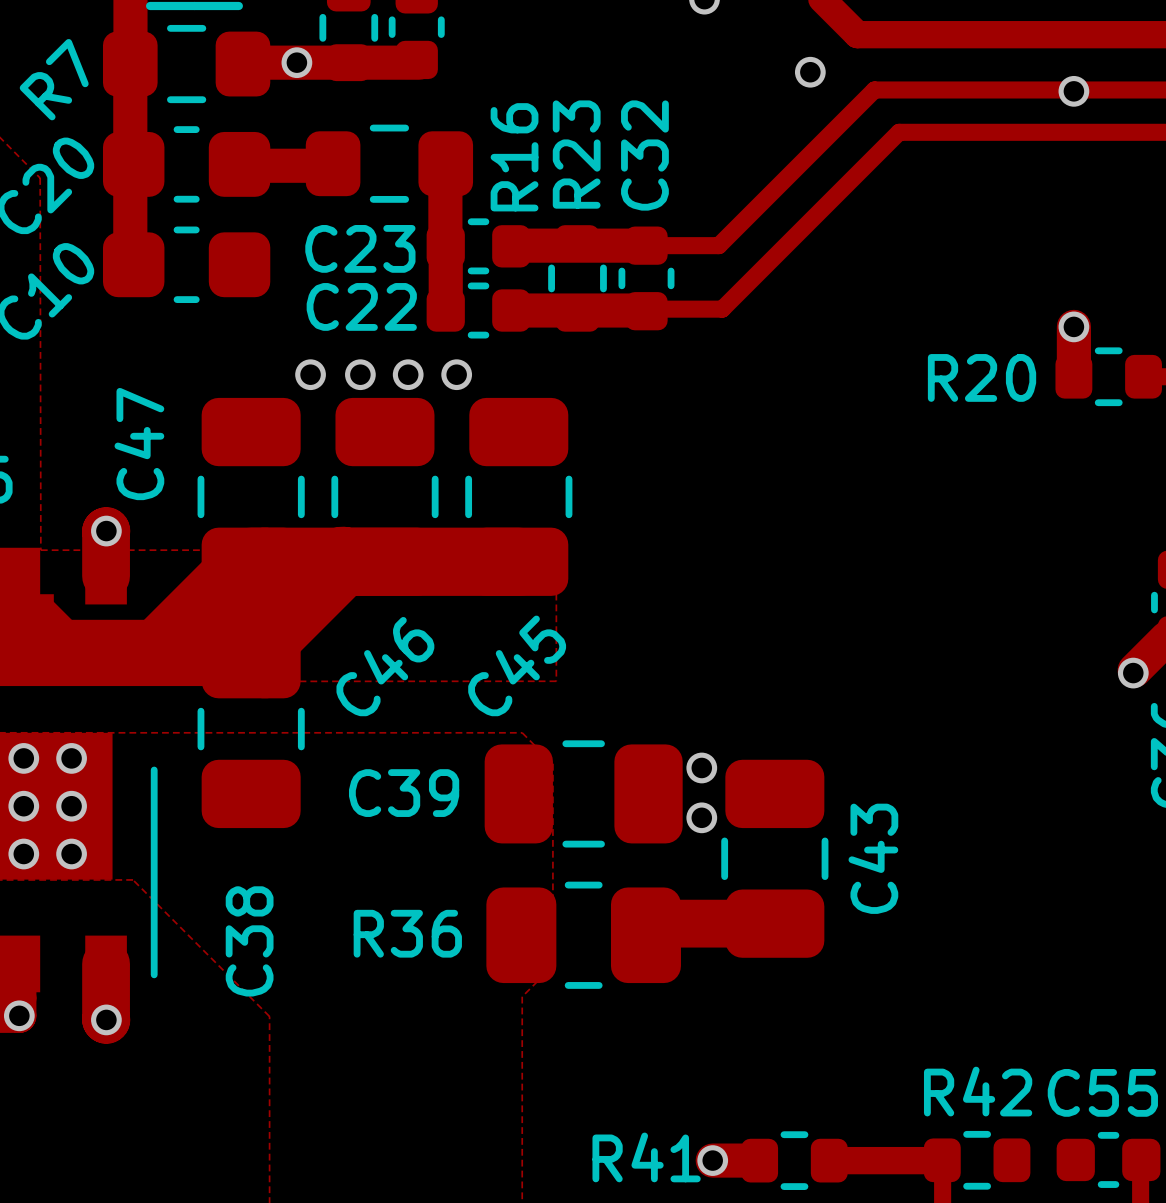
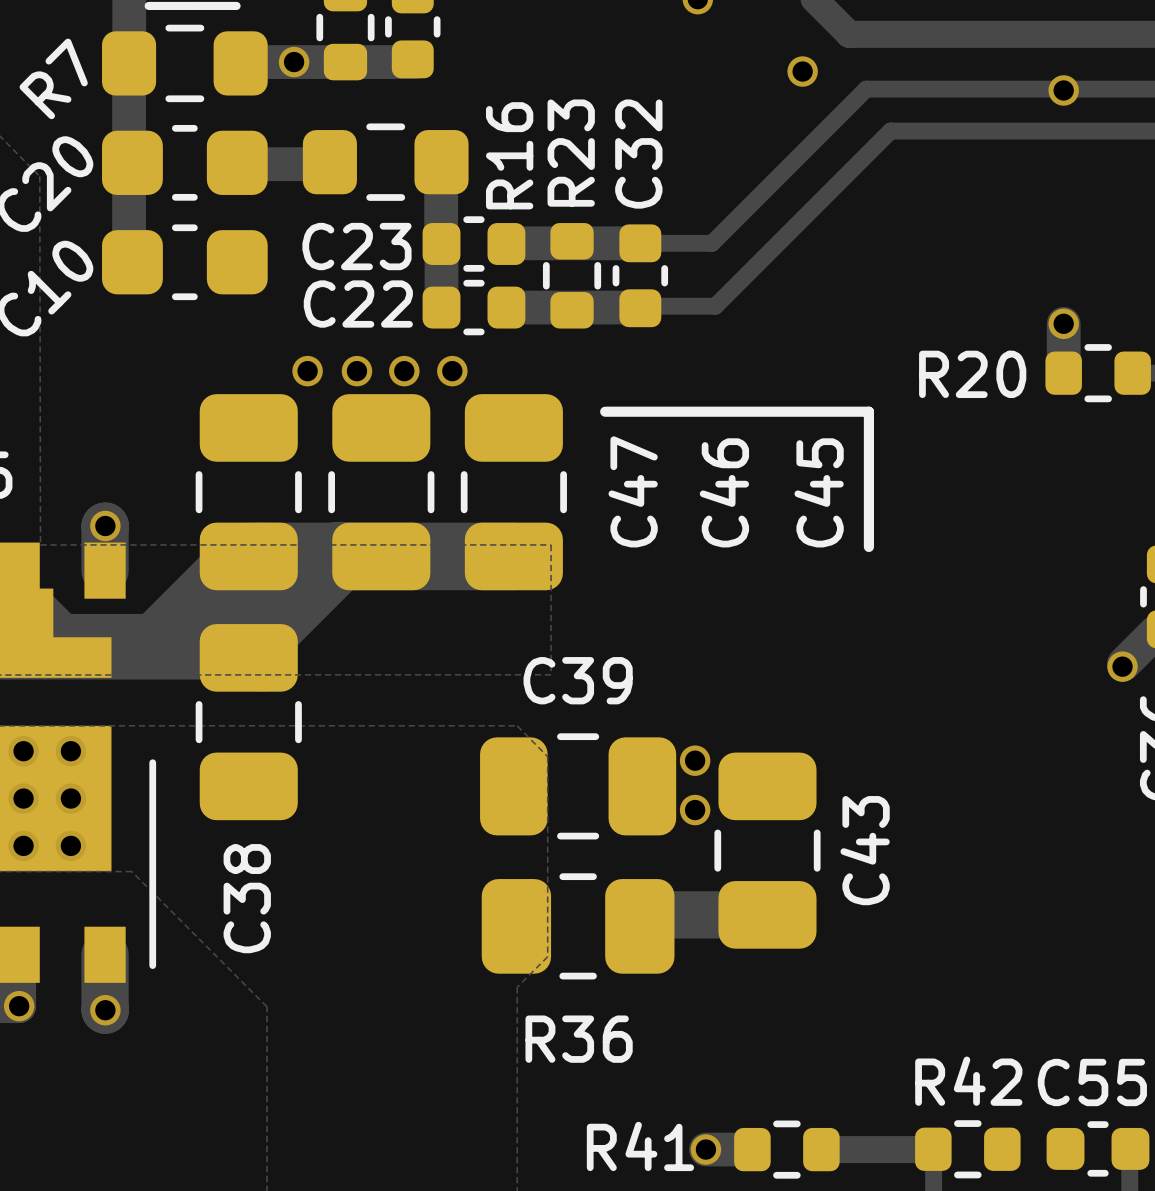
line: none -> (605, 411) (868, 411) (868, 546)
C47 name position: C47 (139, 444) -> C47 (633, 491)
C45 name rotation: 0° (517, 665) -> 45° counterclockwise (819, 492)
C45 name position: C45 (517, 665) -> C45 (819, 492)
C46 name rotation: 0° (385, 666) -> 45° counterclockwise (724, 492)
C46 name position: C46 (385, 666) -> C46 (724, 492)
C39 name position: C39 (404, 793) -> C39 (578, 680)
R36 name position: R36 (407, 933) -> R36 (579, 1039)
C38 name position: C38 (249, 941) -> C38 (247, 898)

